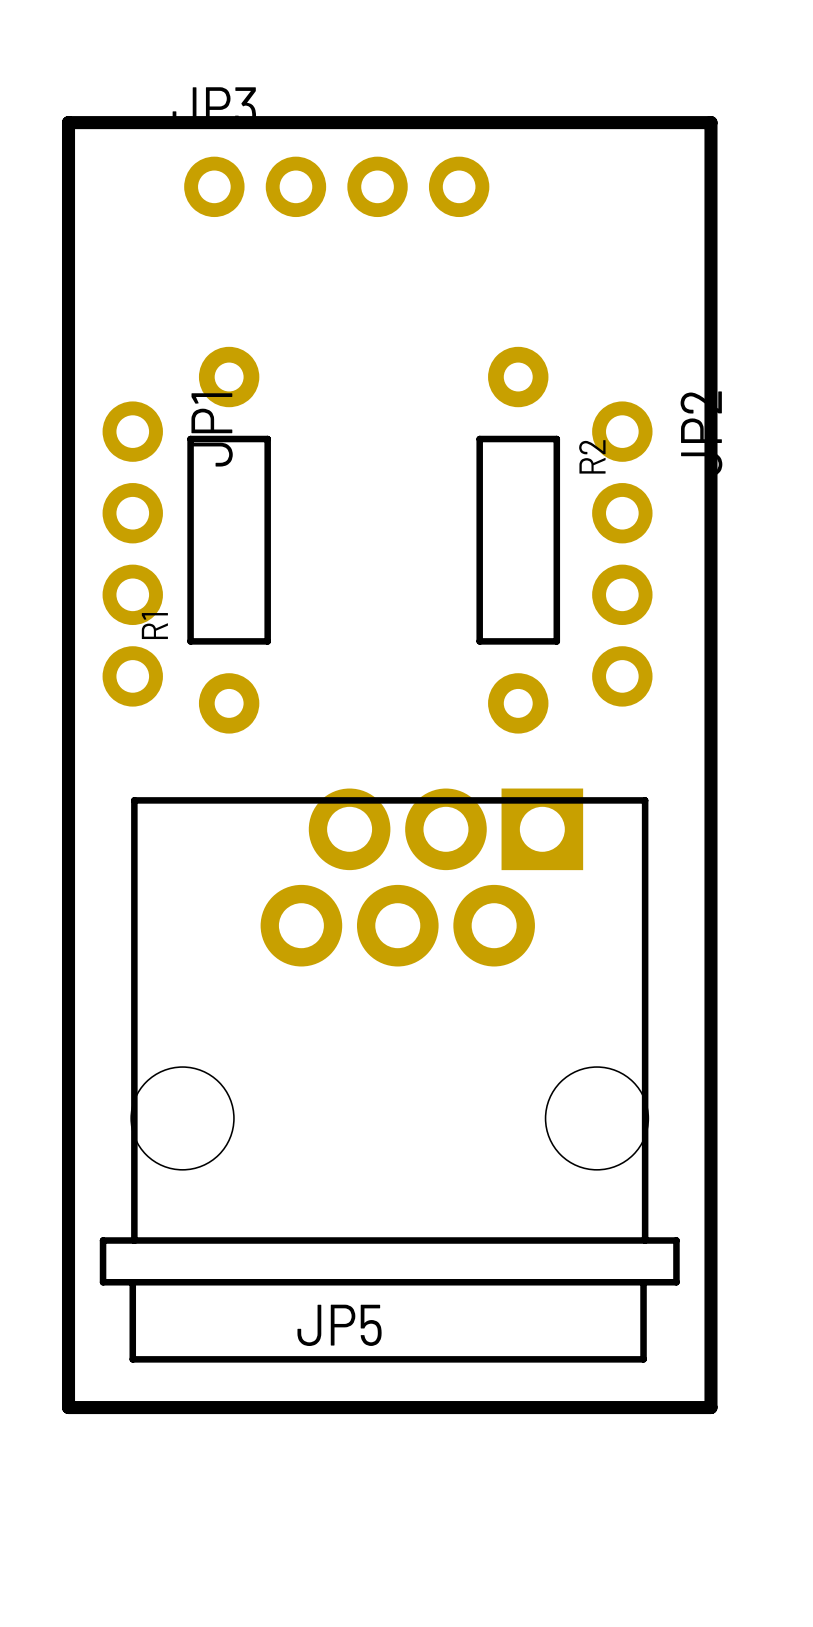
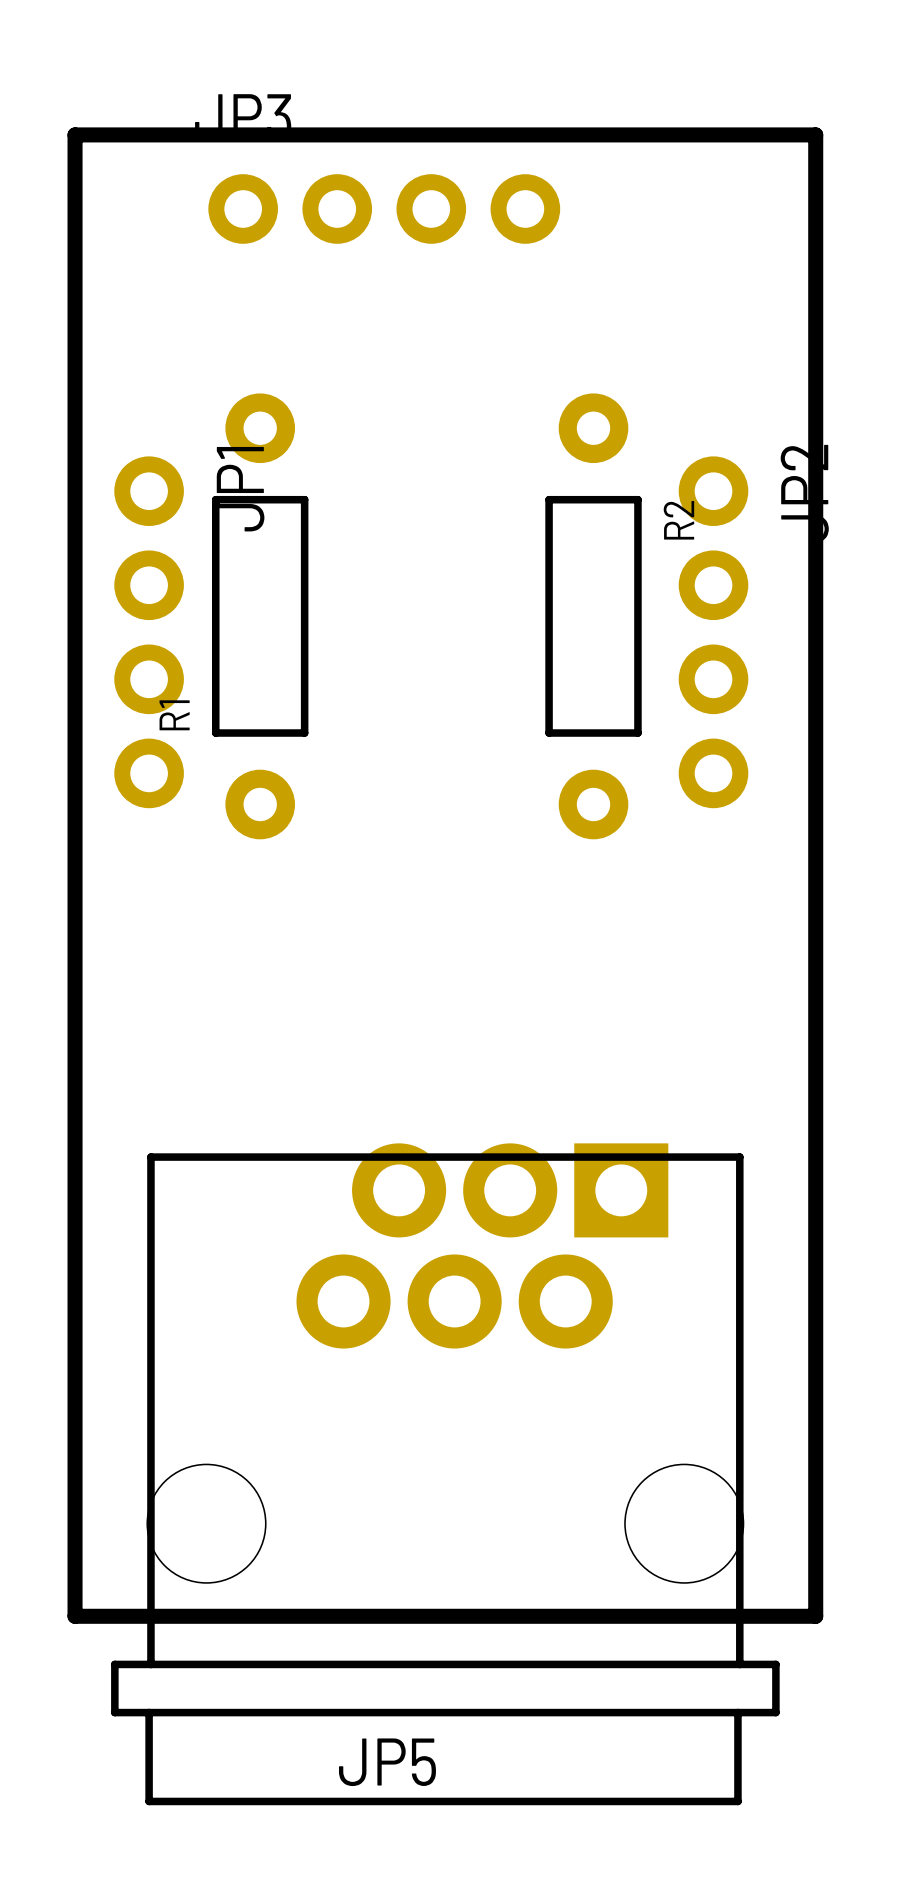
JP5 position: (389, 1075) -> (445, 1474)

